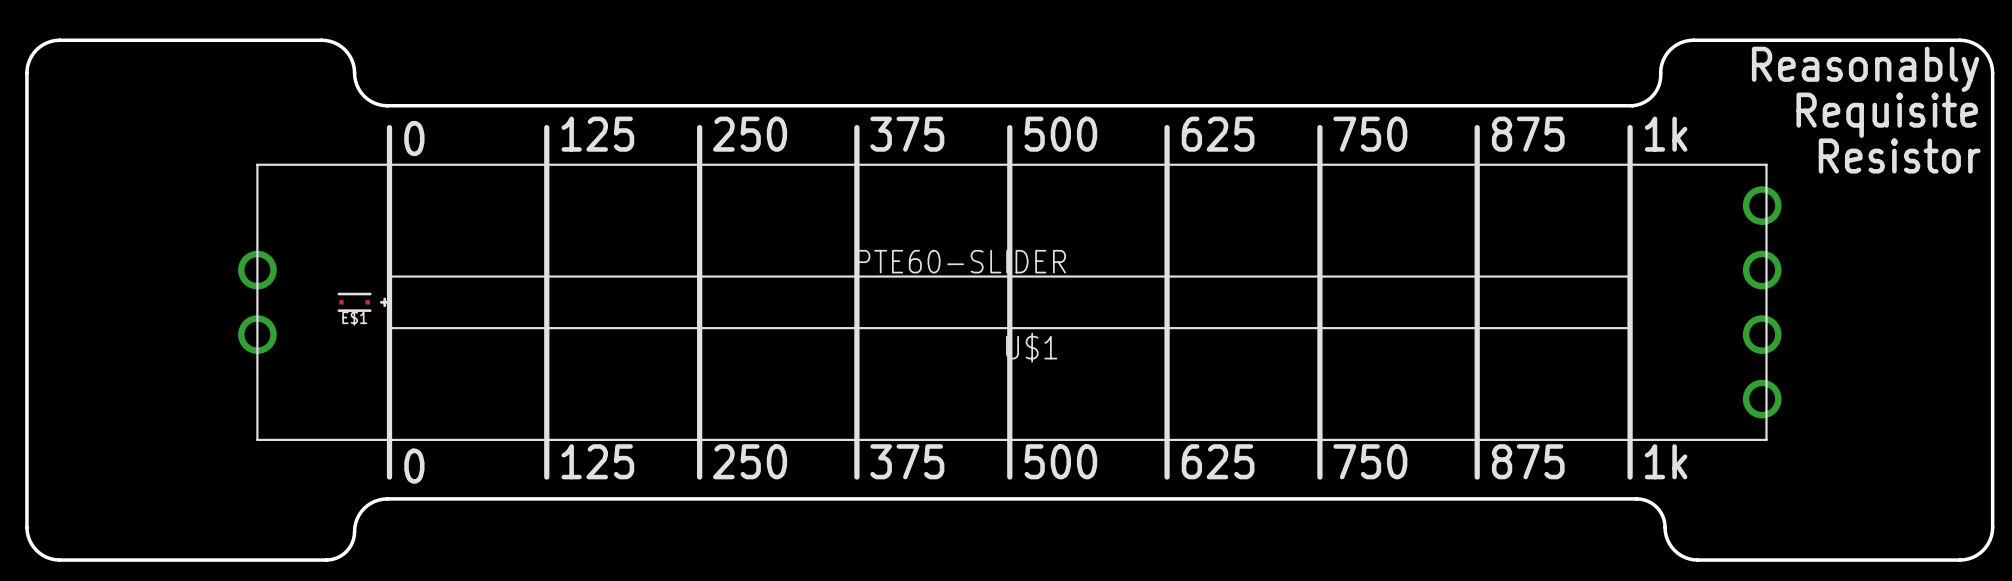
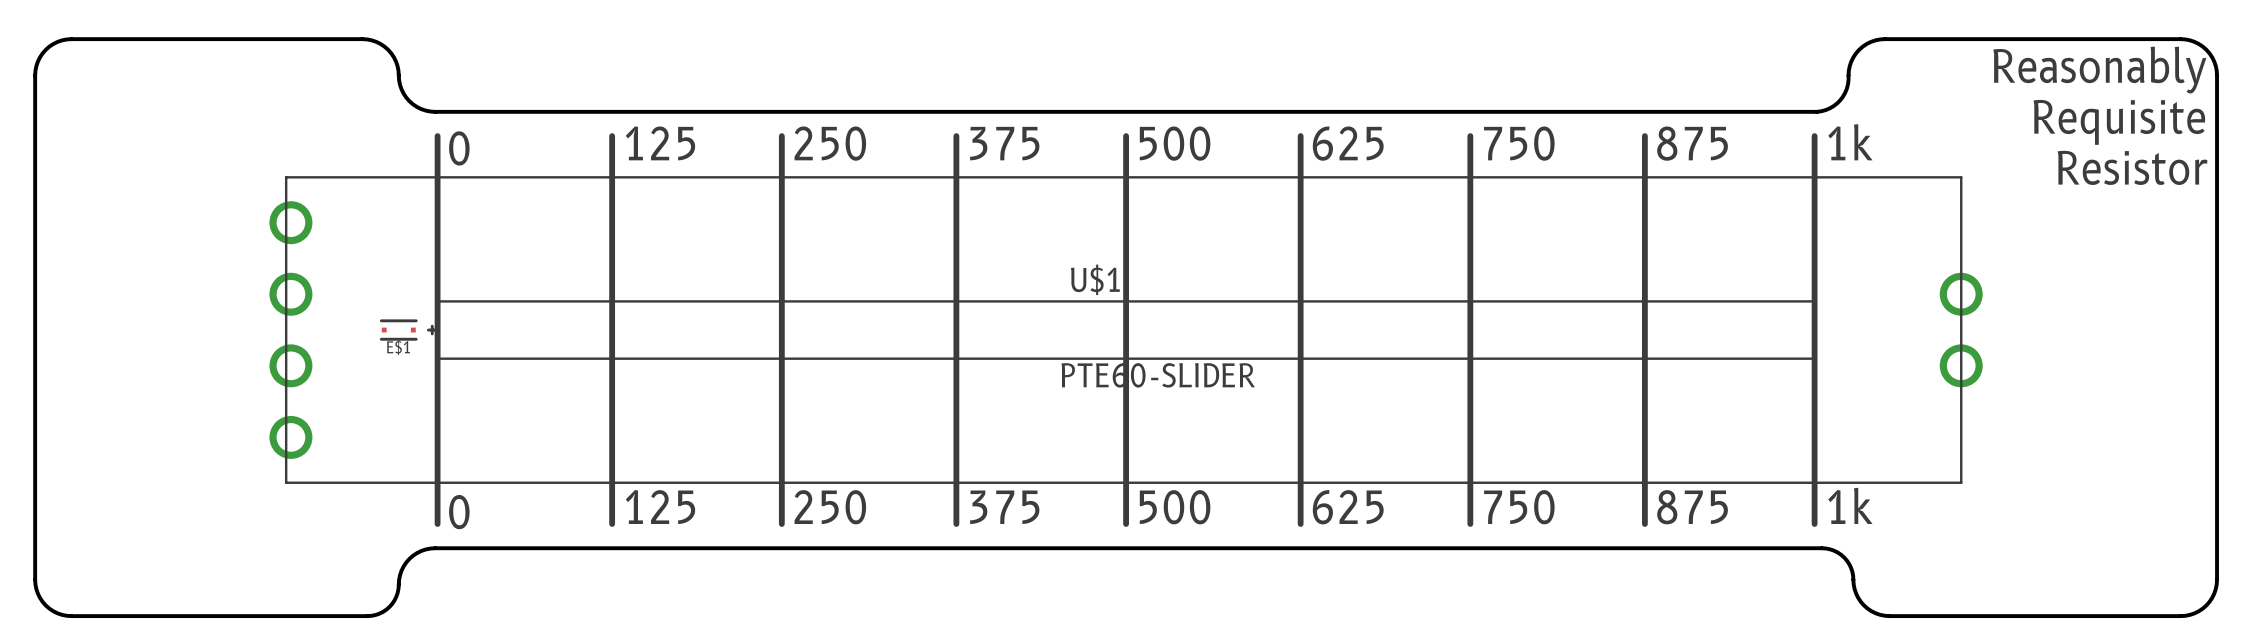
U$1 rotation: 0° (1009, 302) -> 180° (1126, 330)

